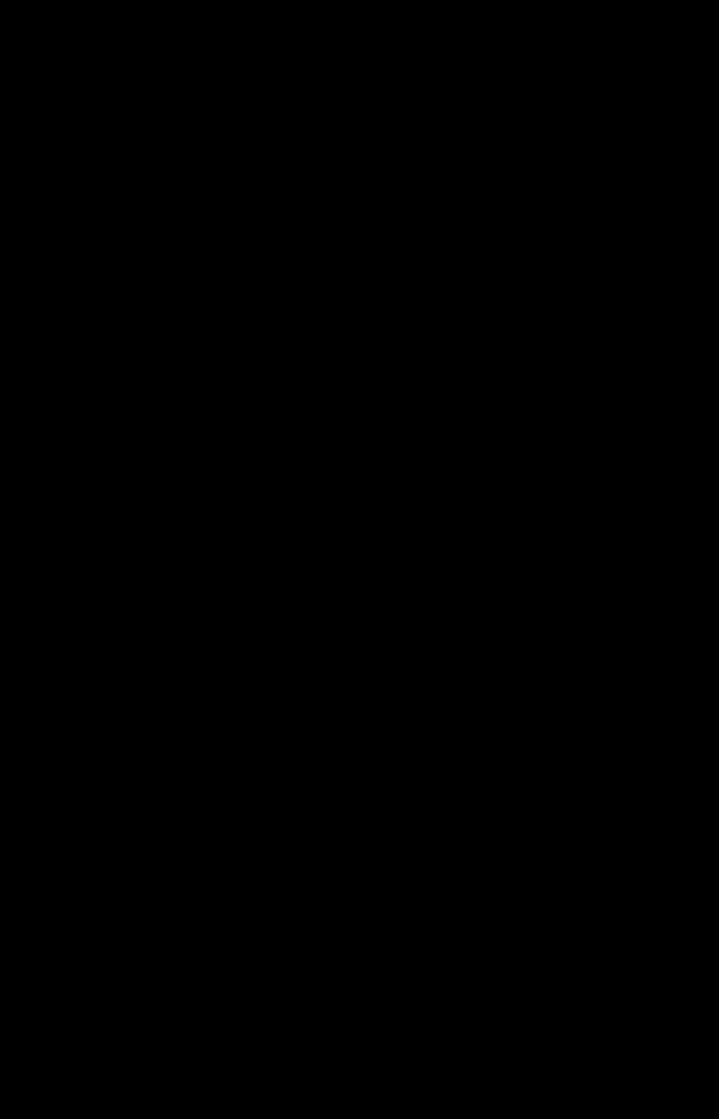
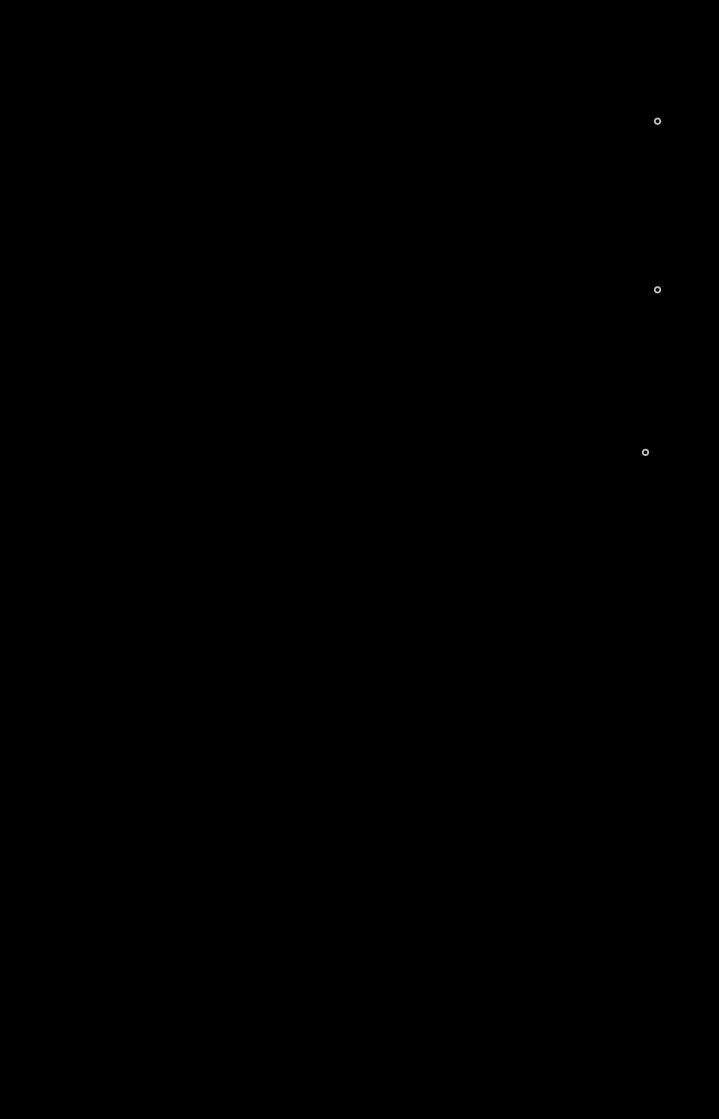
via: none -> (657, 121)
via: none -> (657, 289)
via: none -> (645, 452)

